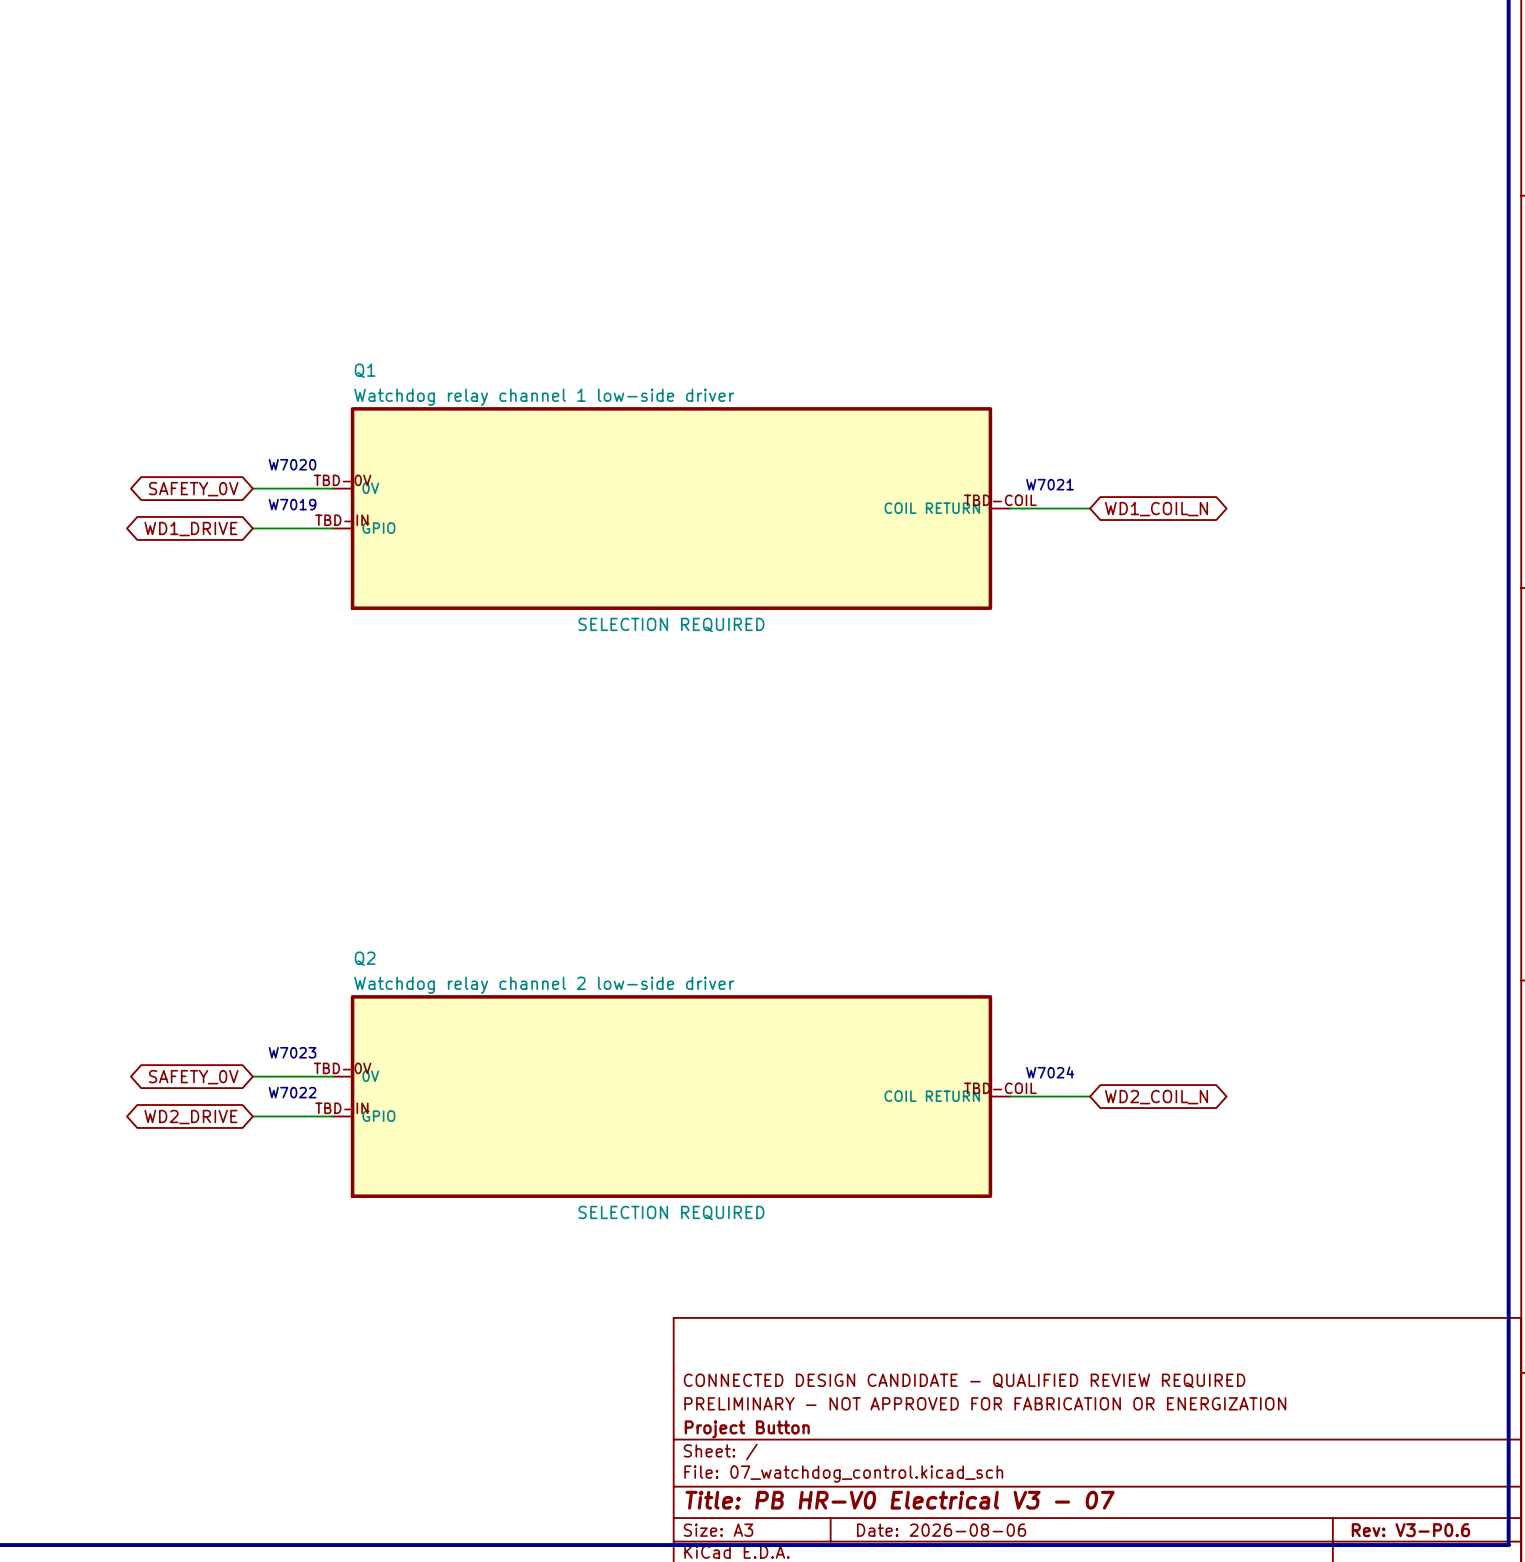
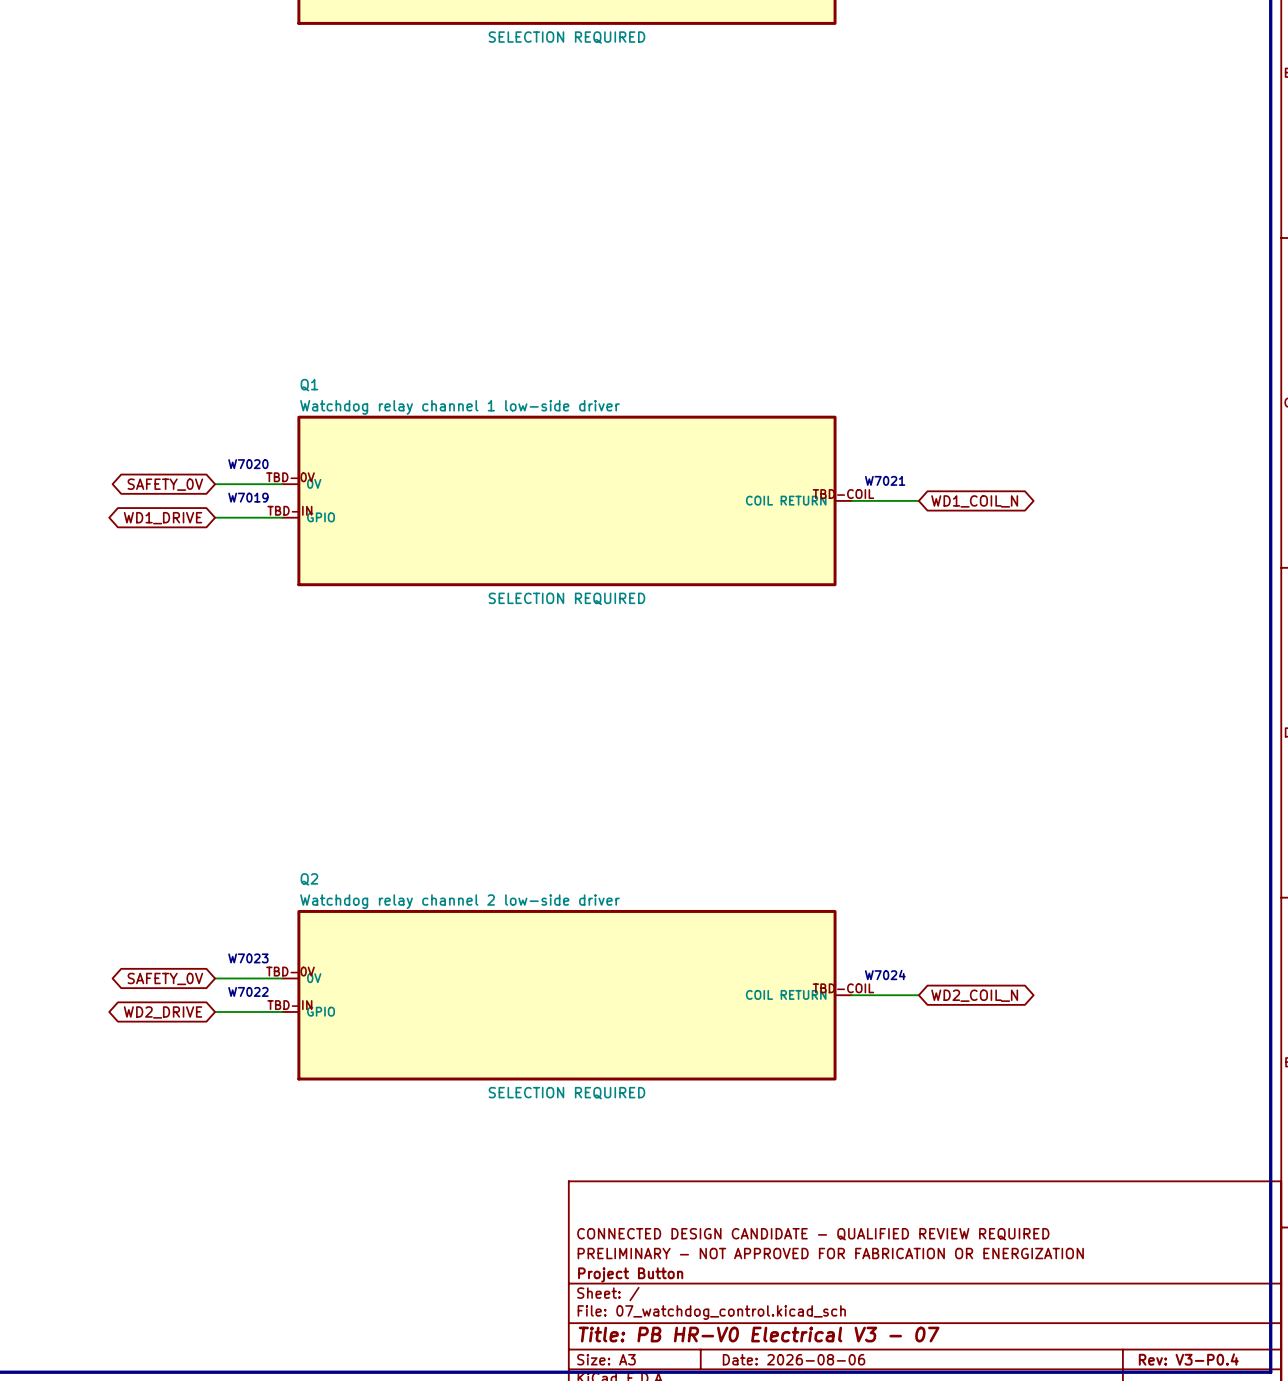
title block: Rev: V3-P0.6 (1410, 1530) -> Rev: V3-P0.4 (1188, 1359)

